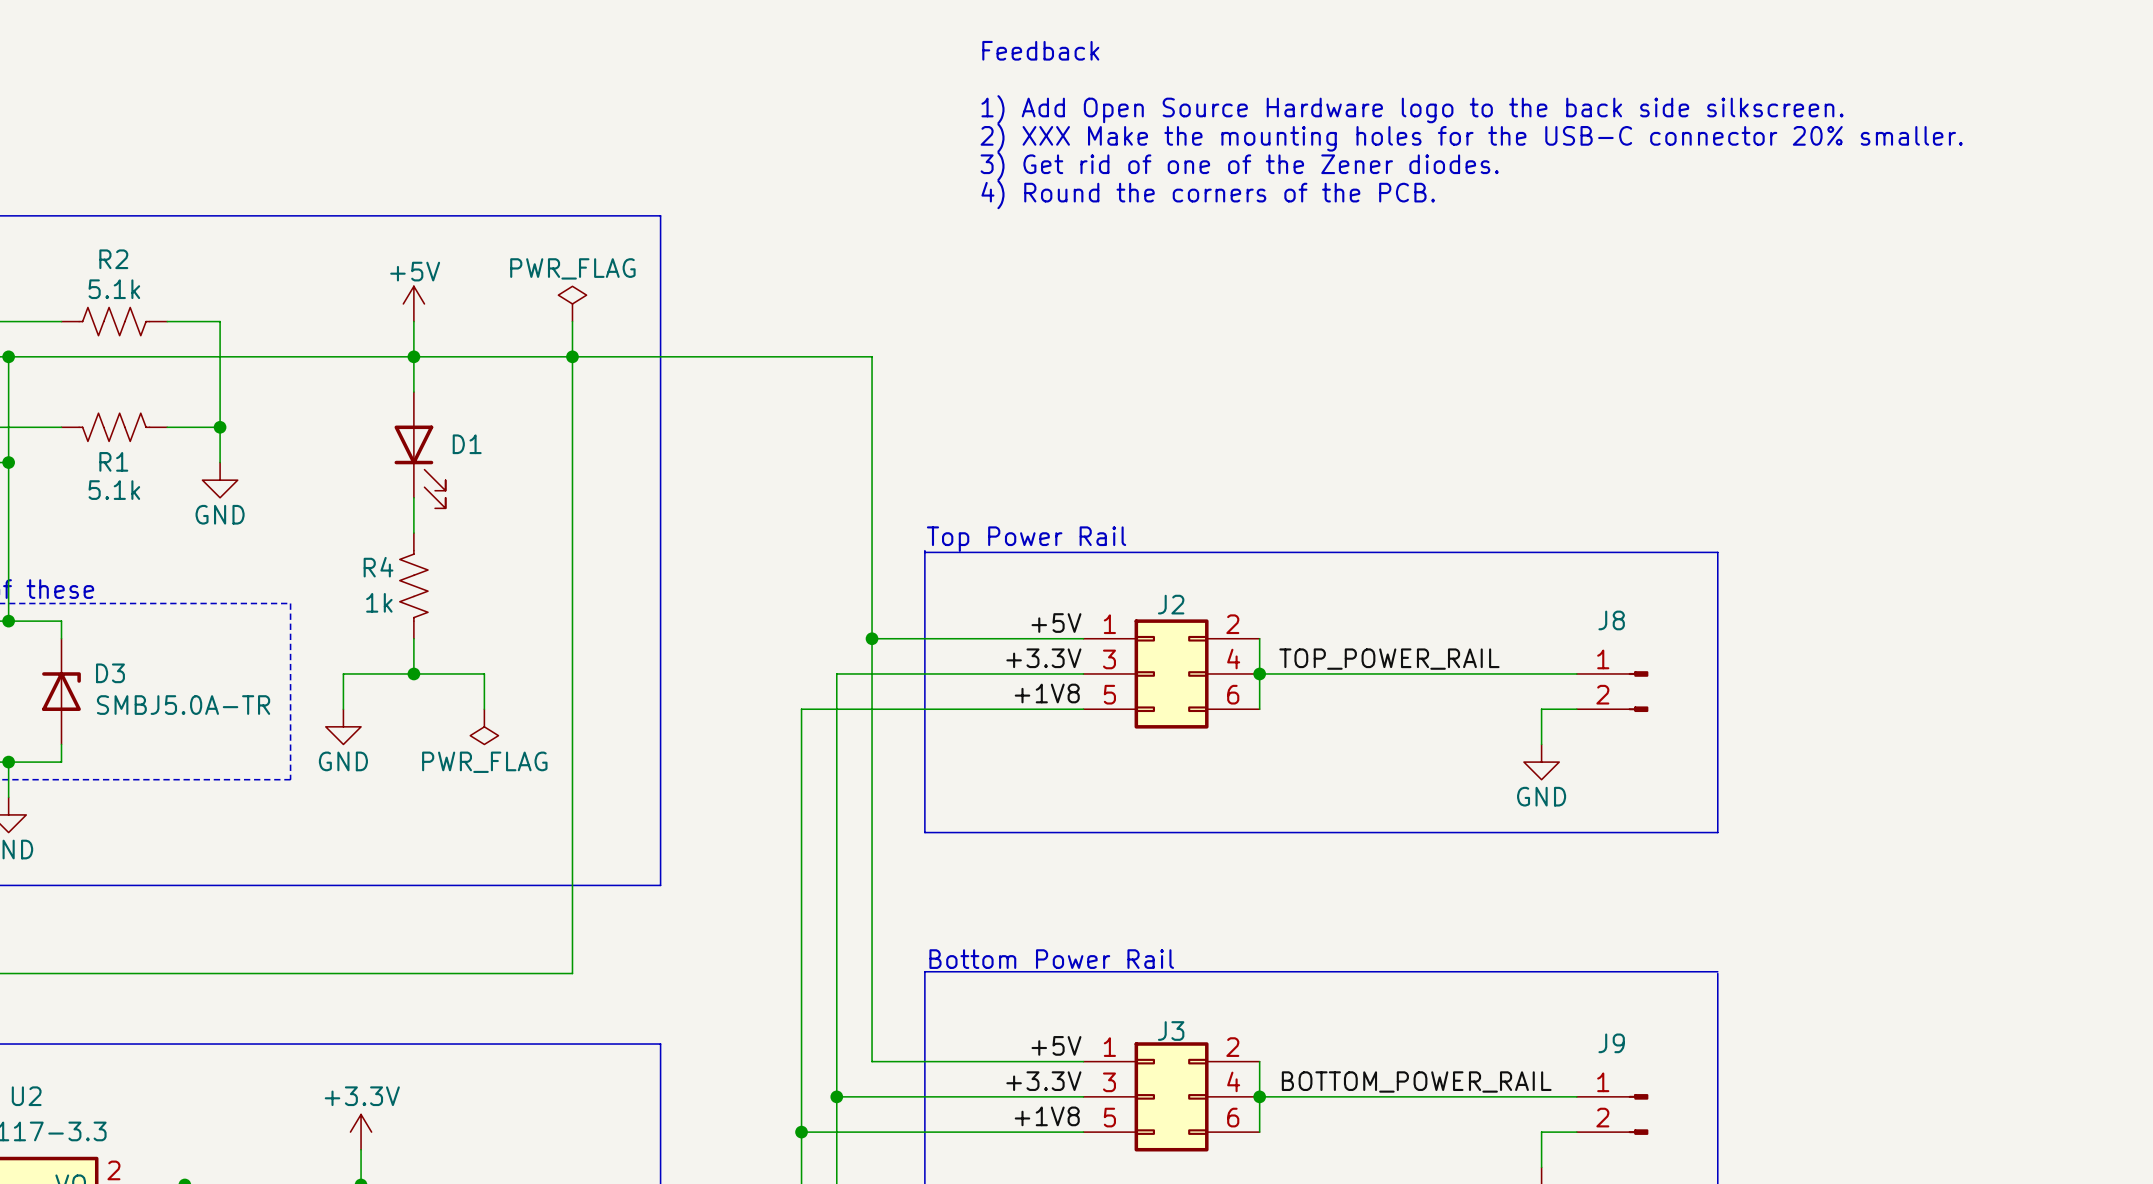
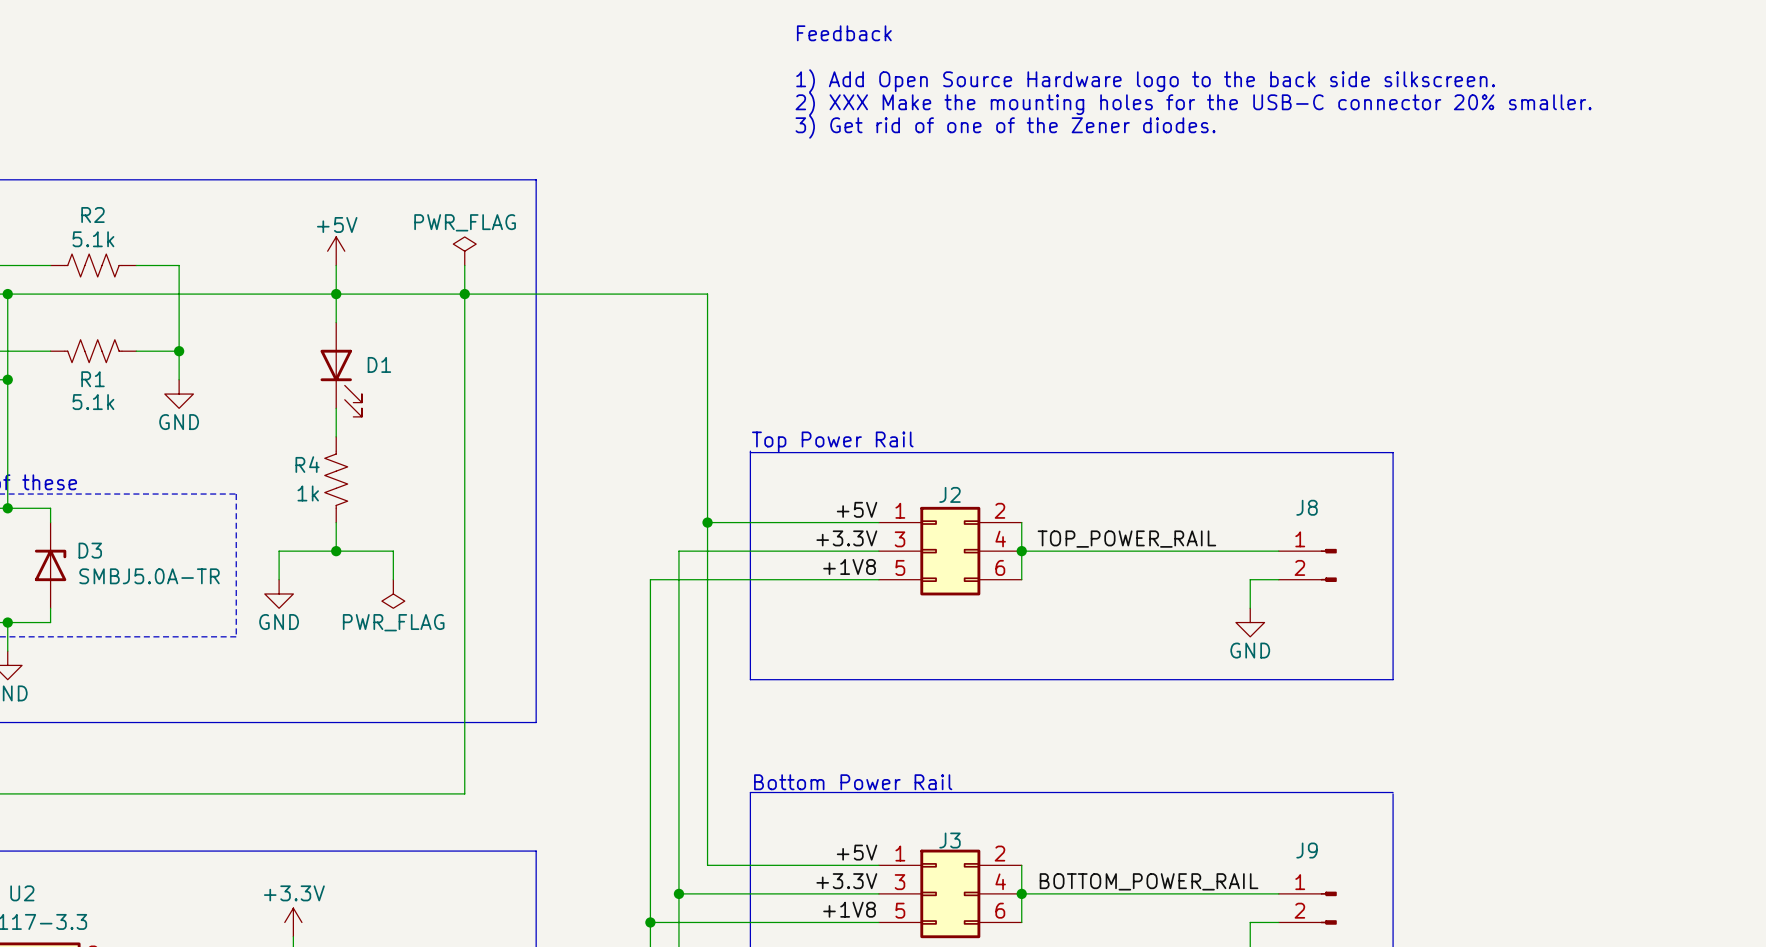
text position: Feedback (1040, 50) -> Feedback (844, 33)
text position: 1) Add Open Source Hardware logo to the back side silkscreen. (1412, 109) -> 1) Add Open Source Hardware logo to the back side silkscreen. (1145, 80)
text position: 2) XXX Make the mounting holes for the USB-C connector 20% smaller. (1471, 137) -> 2) XXX Make the mounting holes for the USB-C connector 20% smaller. (1193, 103)
text position: 3) Get rid of one of the Zener diodes. (1239, 166) -> 3) Get rid of one of the Zener diodes. (1005, 126)
text: 4) Round the corners of the PCB. (1208, 194) -> none

